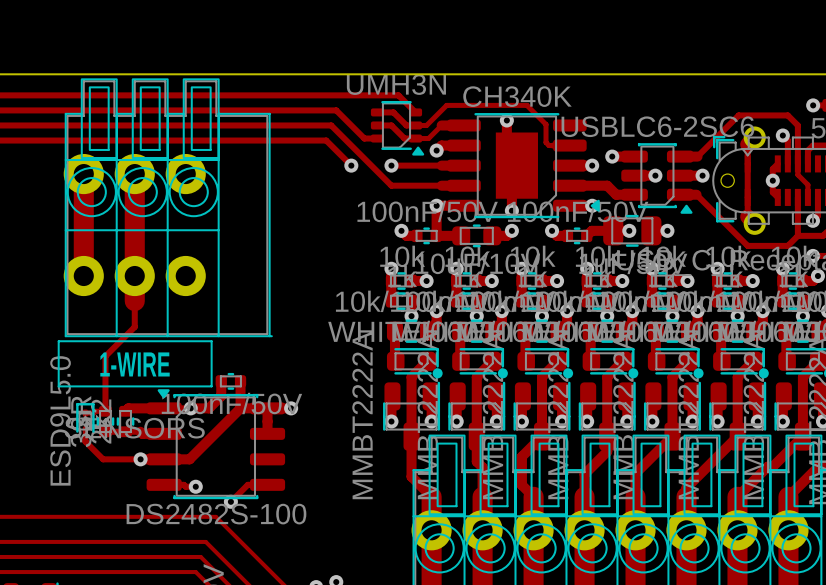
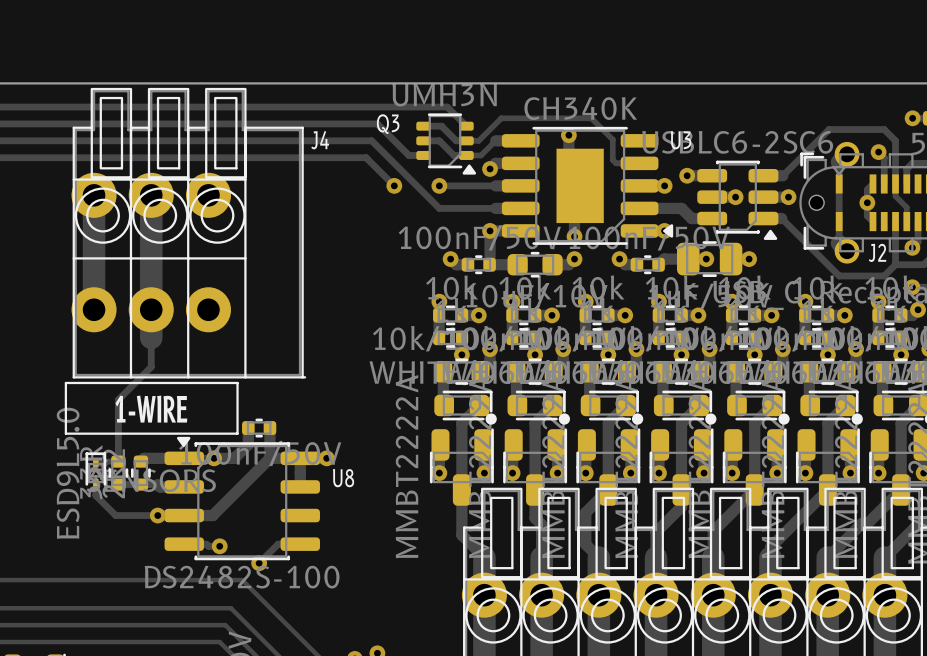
Q3 name: none -> Q3 (388, 124)
J4 name: none -> J4 (320, 140)
U3 name: none -> U3 (681, 140)
J2 name: none -> J2 (877, 252)
U8 name: none -> U8 (343, 478)

